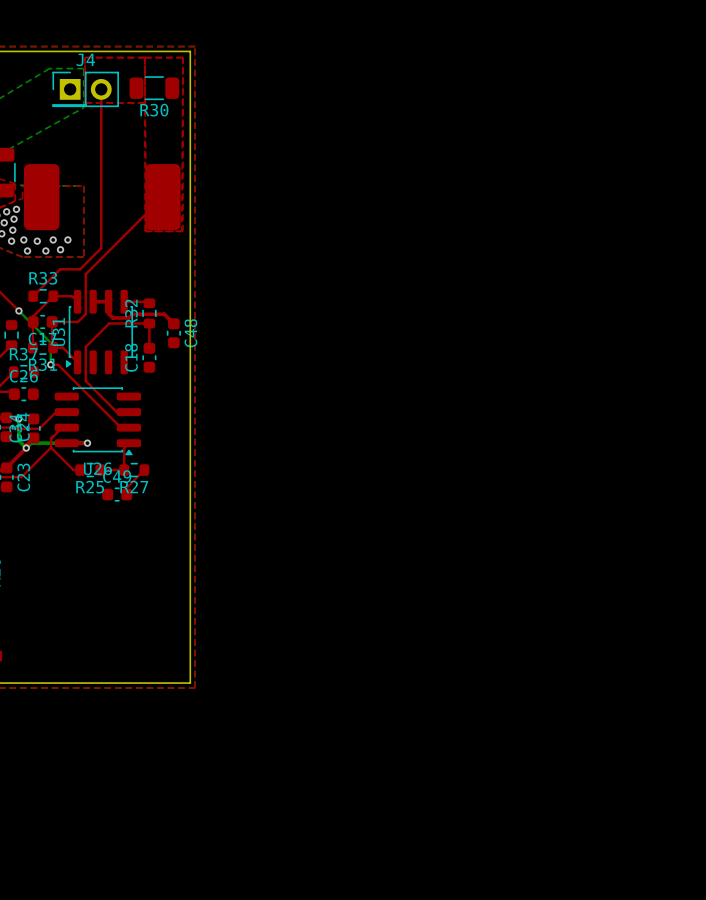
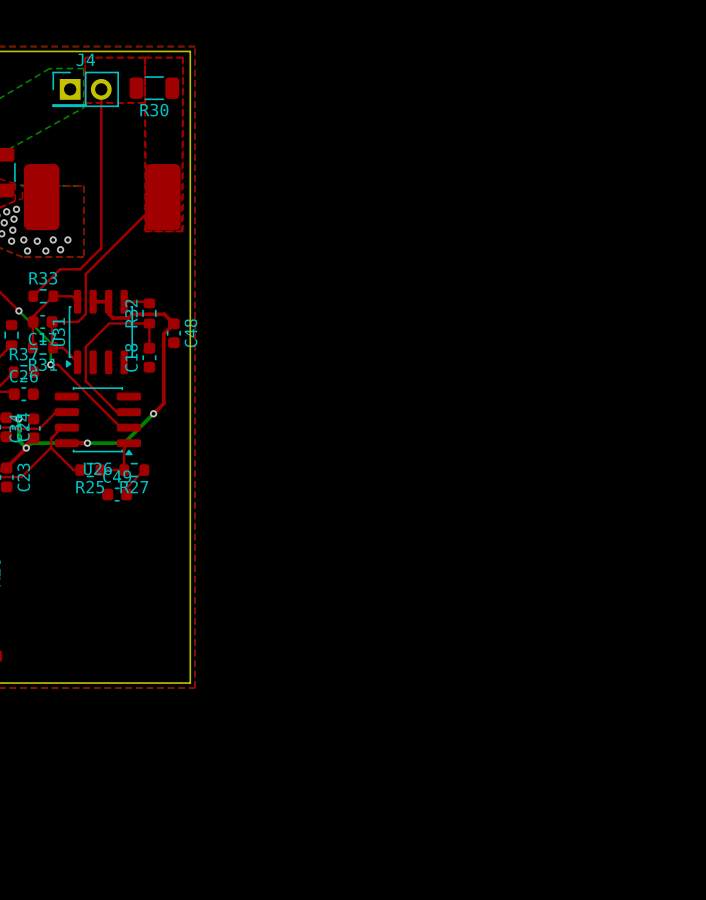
top track: none -> (173, 323) (163, 333) (163, 403) (153, 413)
bottom track: none -> (153, 413) (124, 443) (87, 443)
via: none -> (153, 413)

